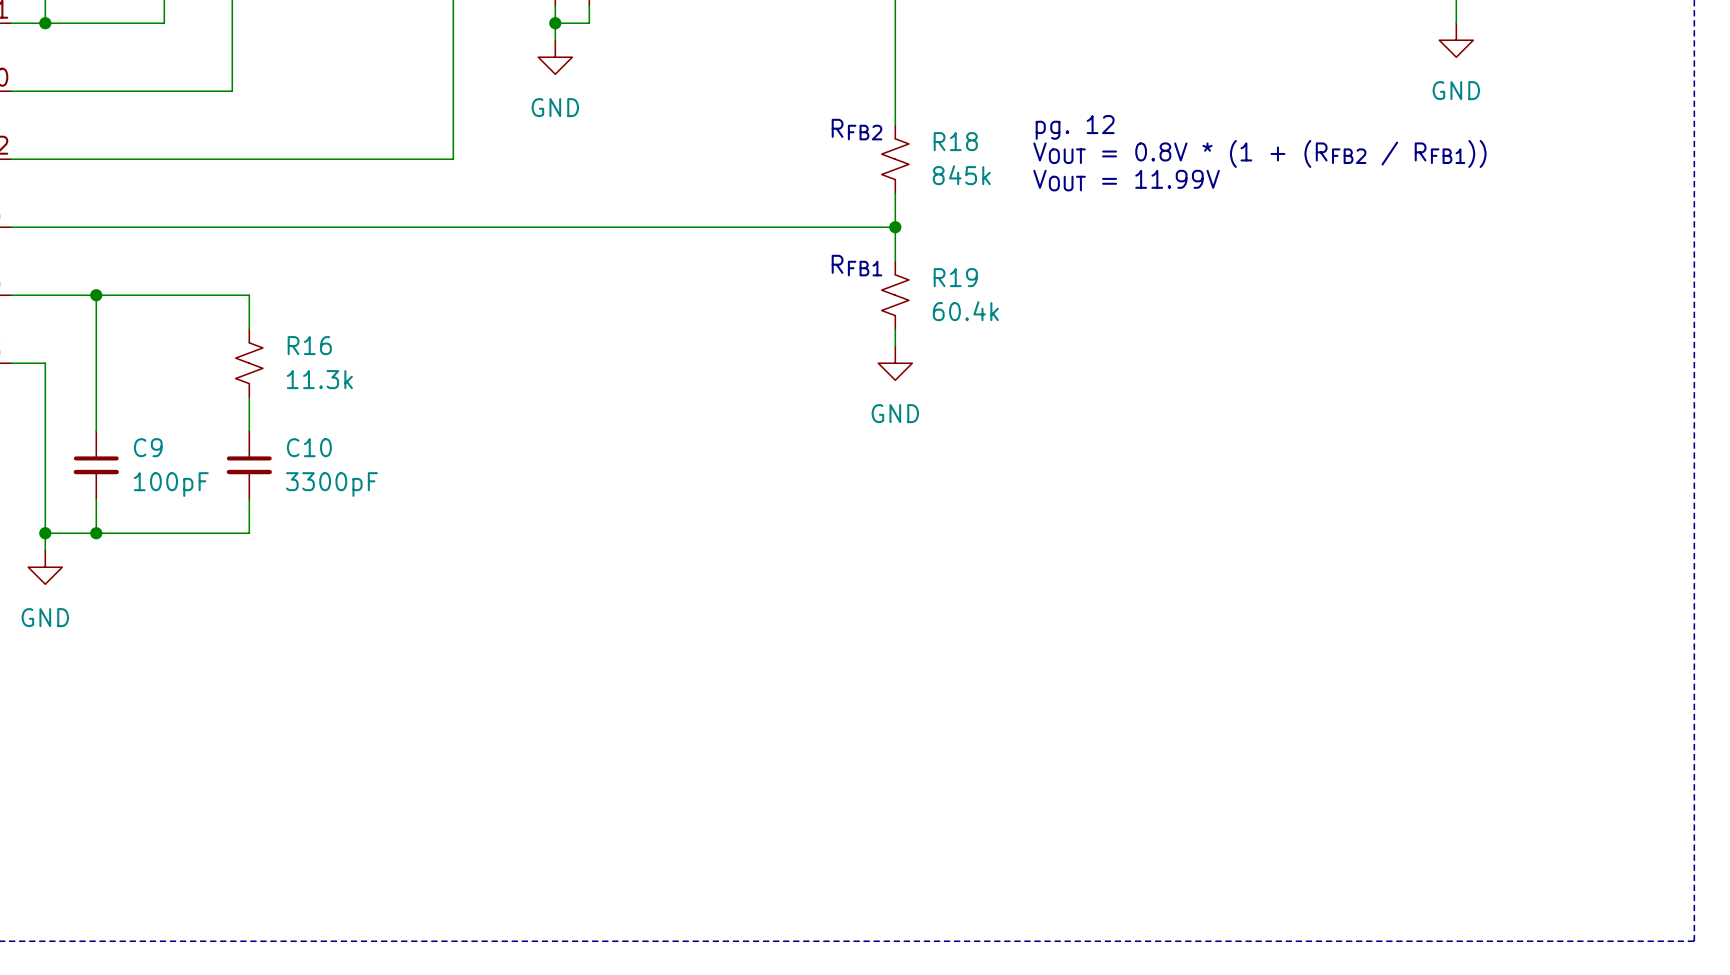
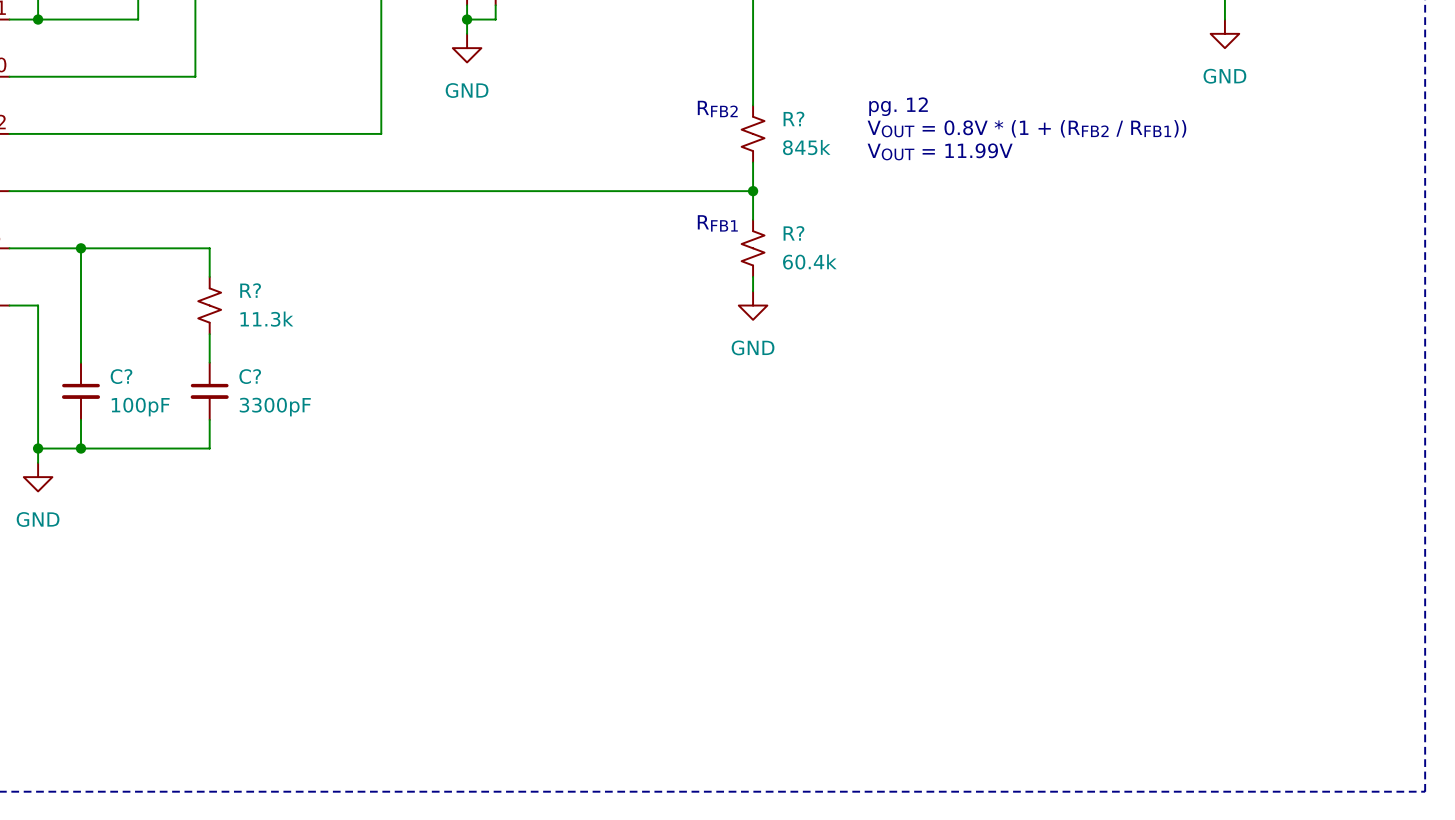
R18 name: R18 (955, 141) -> R? (793, 118)
R19 name: R19 (955, 277) -> R? (793, 233)
R16 name: R16 (309, 345) -> R? (250, 290)
C9 name: C9 (148, 447) -> C? (121, 376)
C10 name: C10 (309, 447) -> C? (250, 376)

